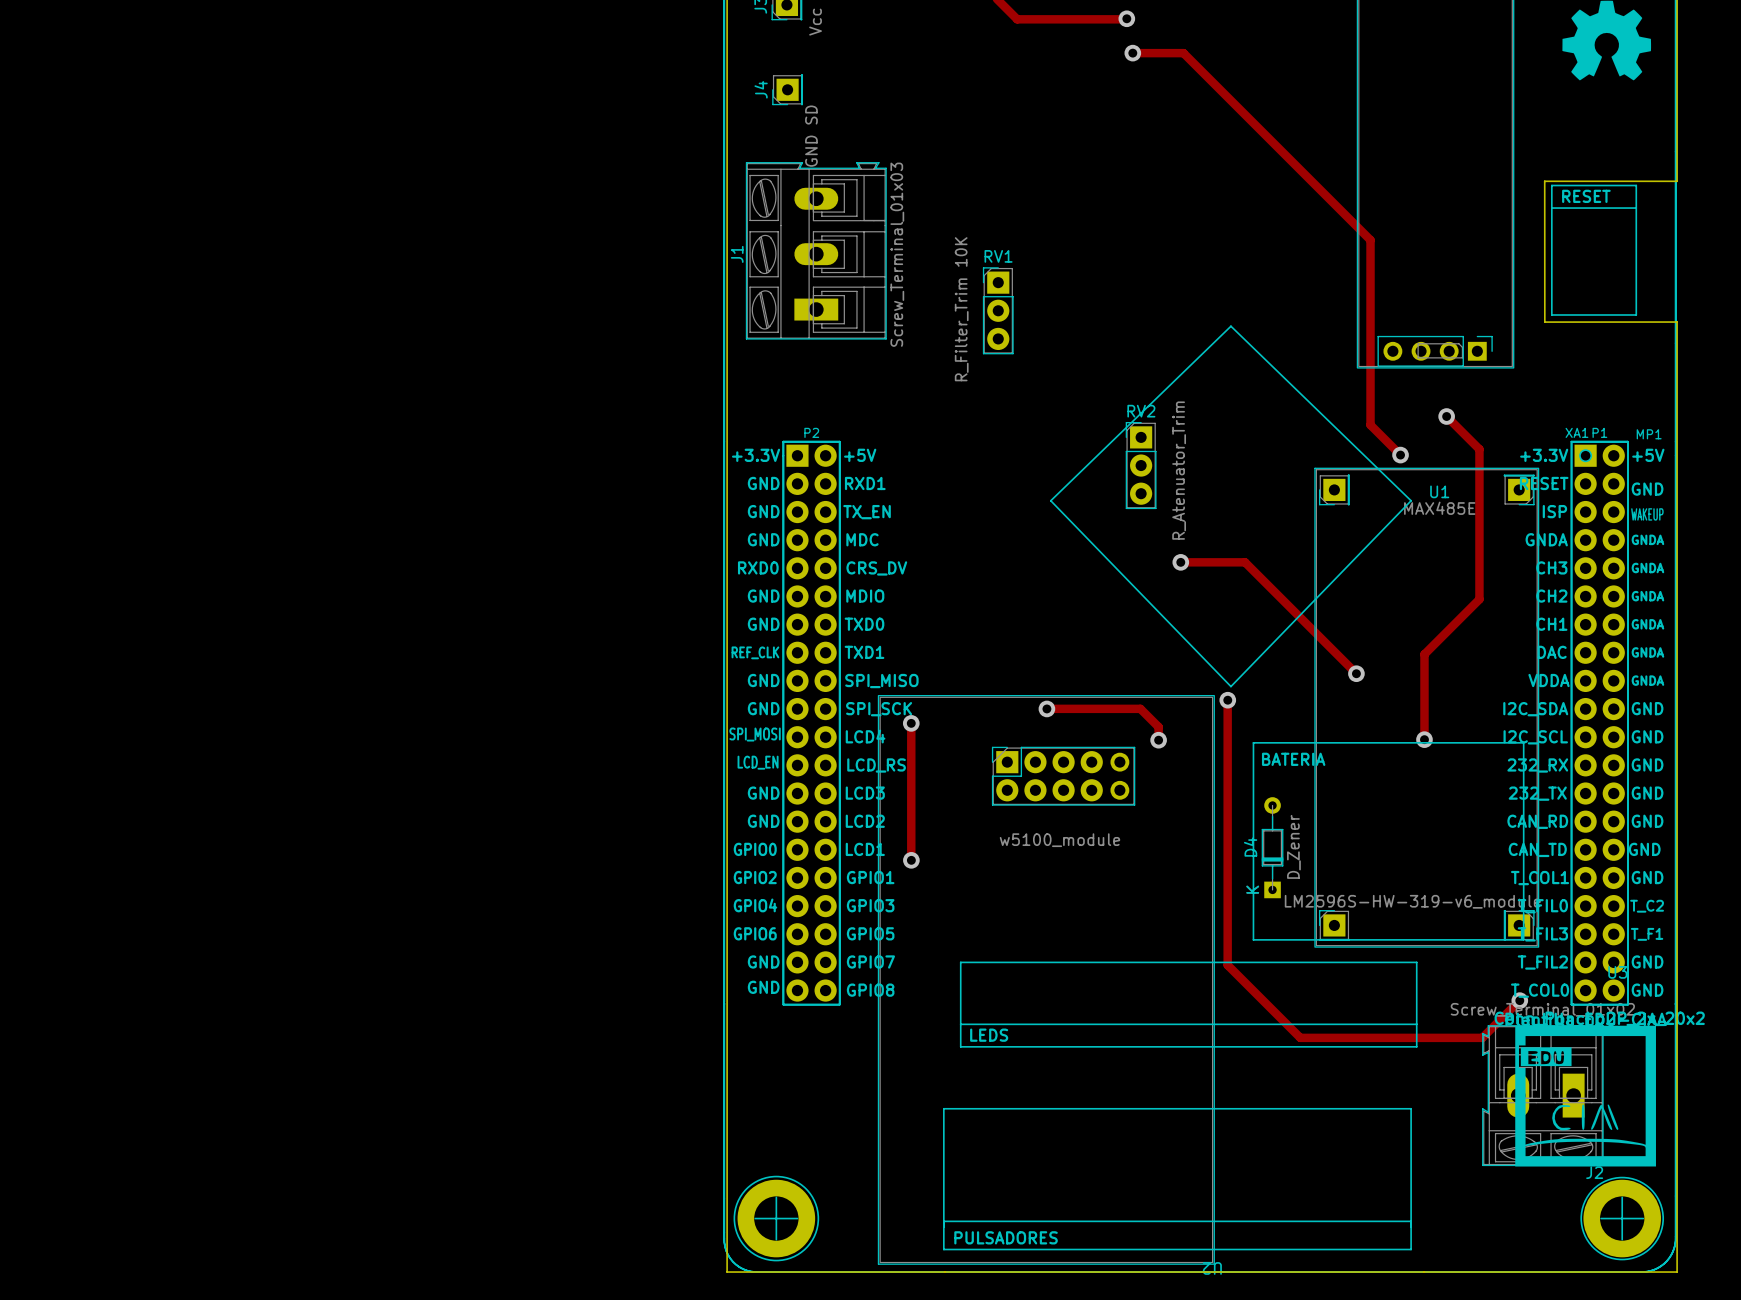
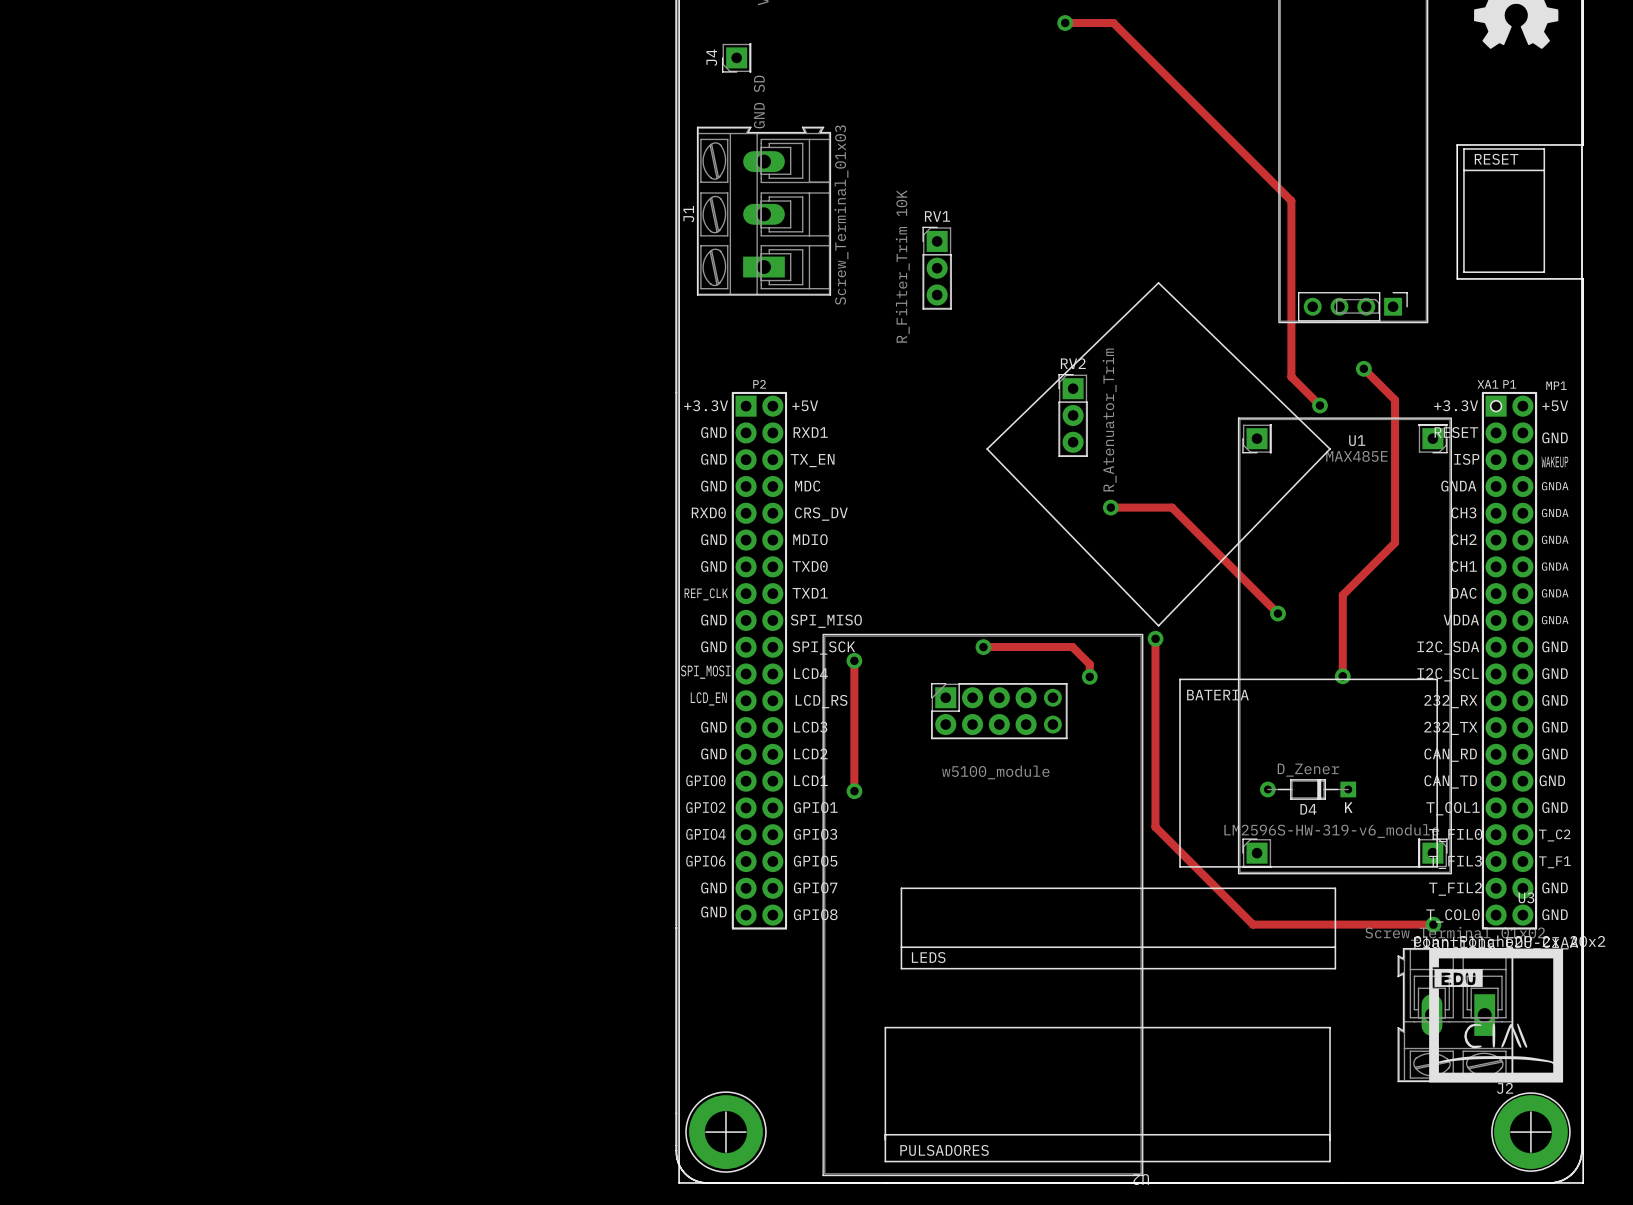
D4 rotation: 0° (1272, 847) -> 90° counterclockwise (1308, 789)
D4 position: (1272, 847) -> (1308, 789)
track: (1227, 898) (1227, 965) (1300, 1037) (1482, 1037) (1519, 1000) -> (1155, 827) (1253, 924) (1433, 924)

